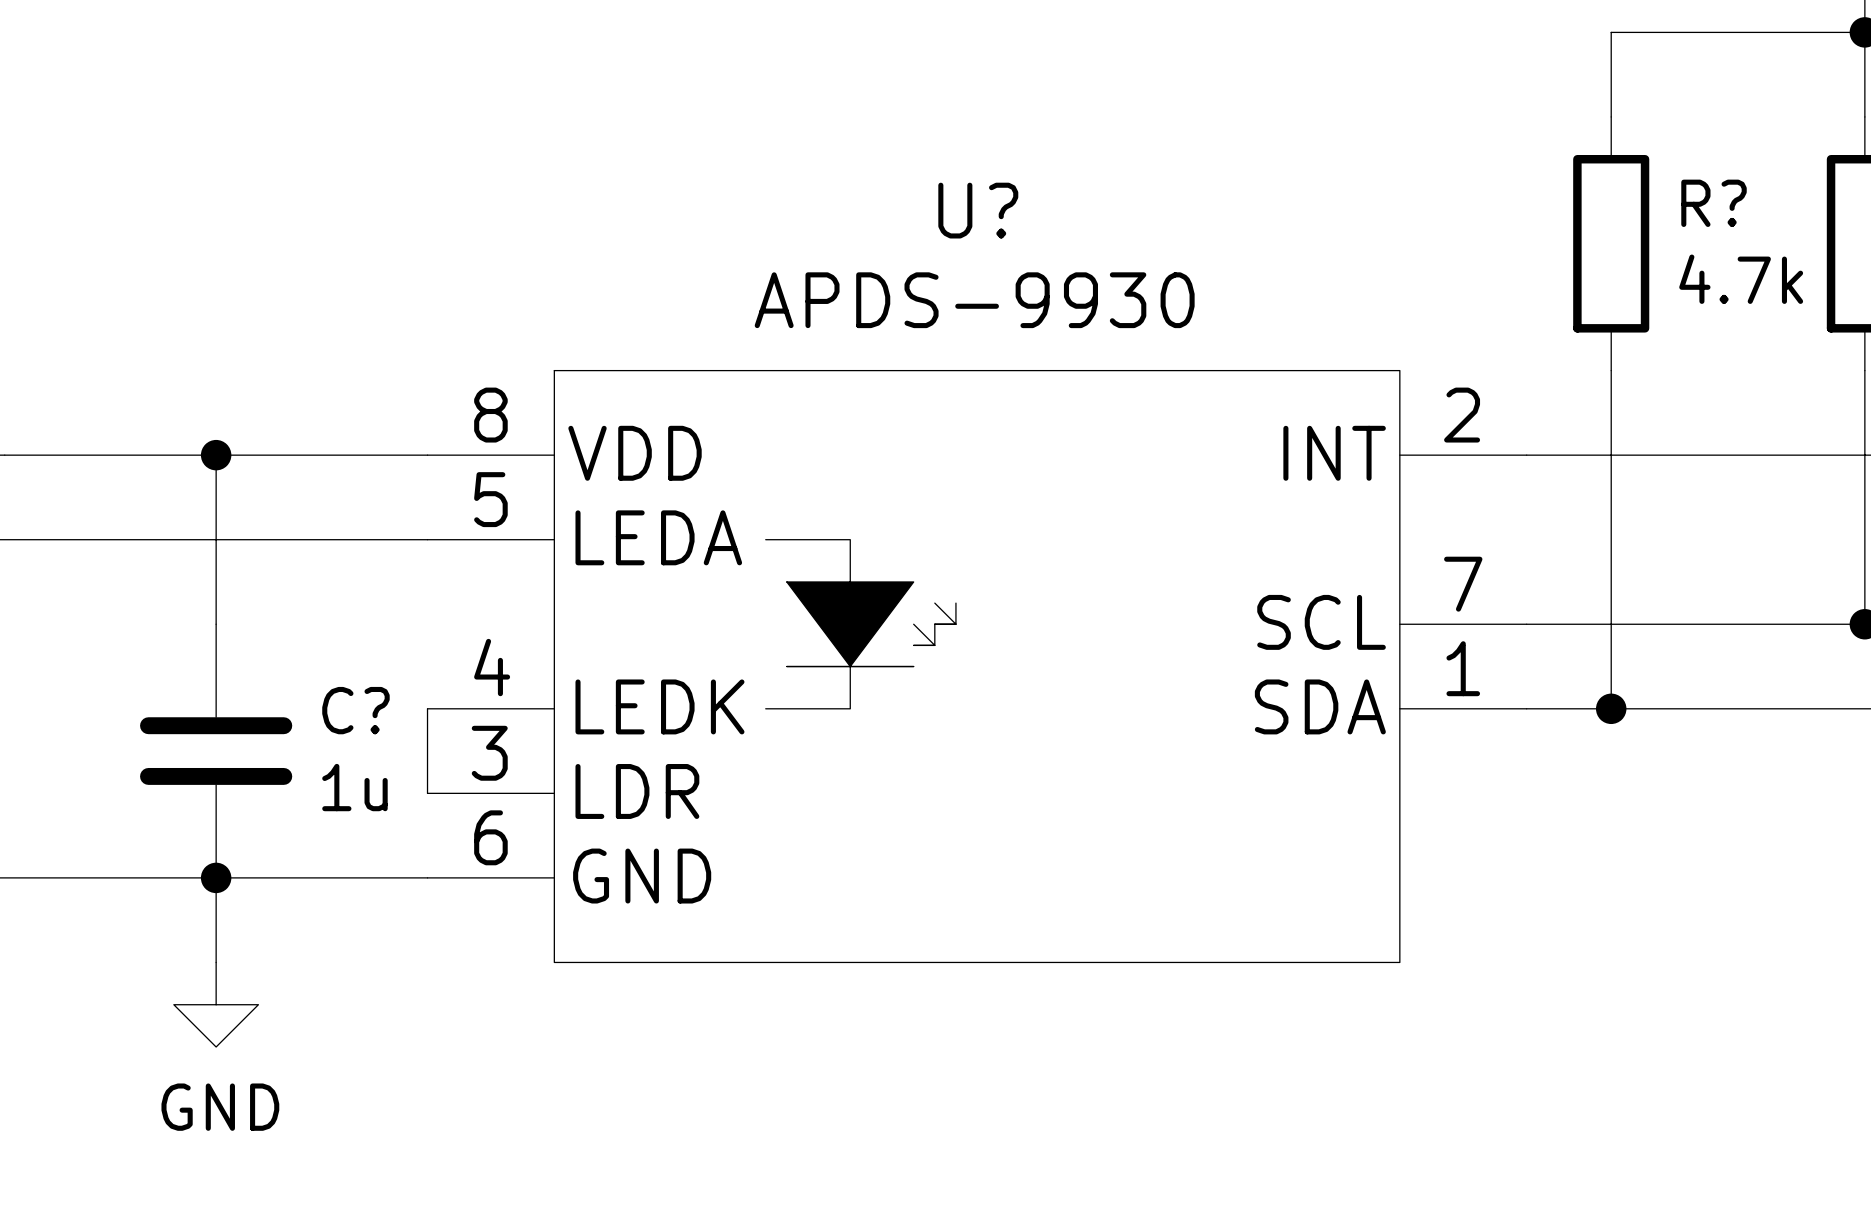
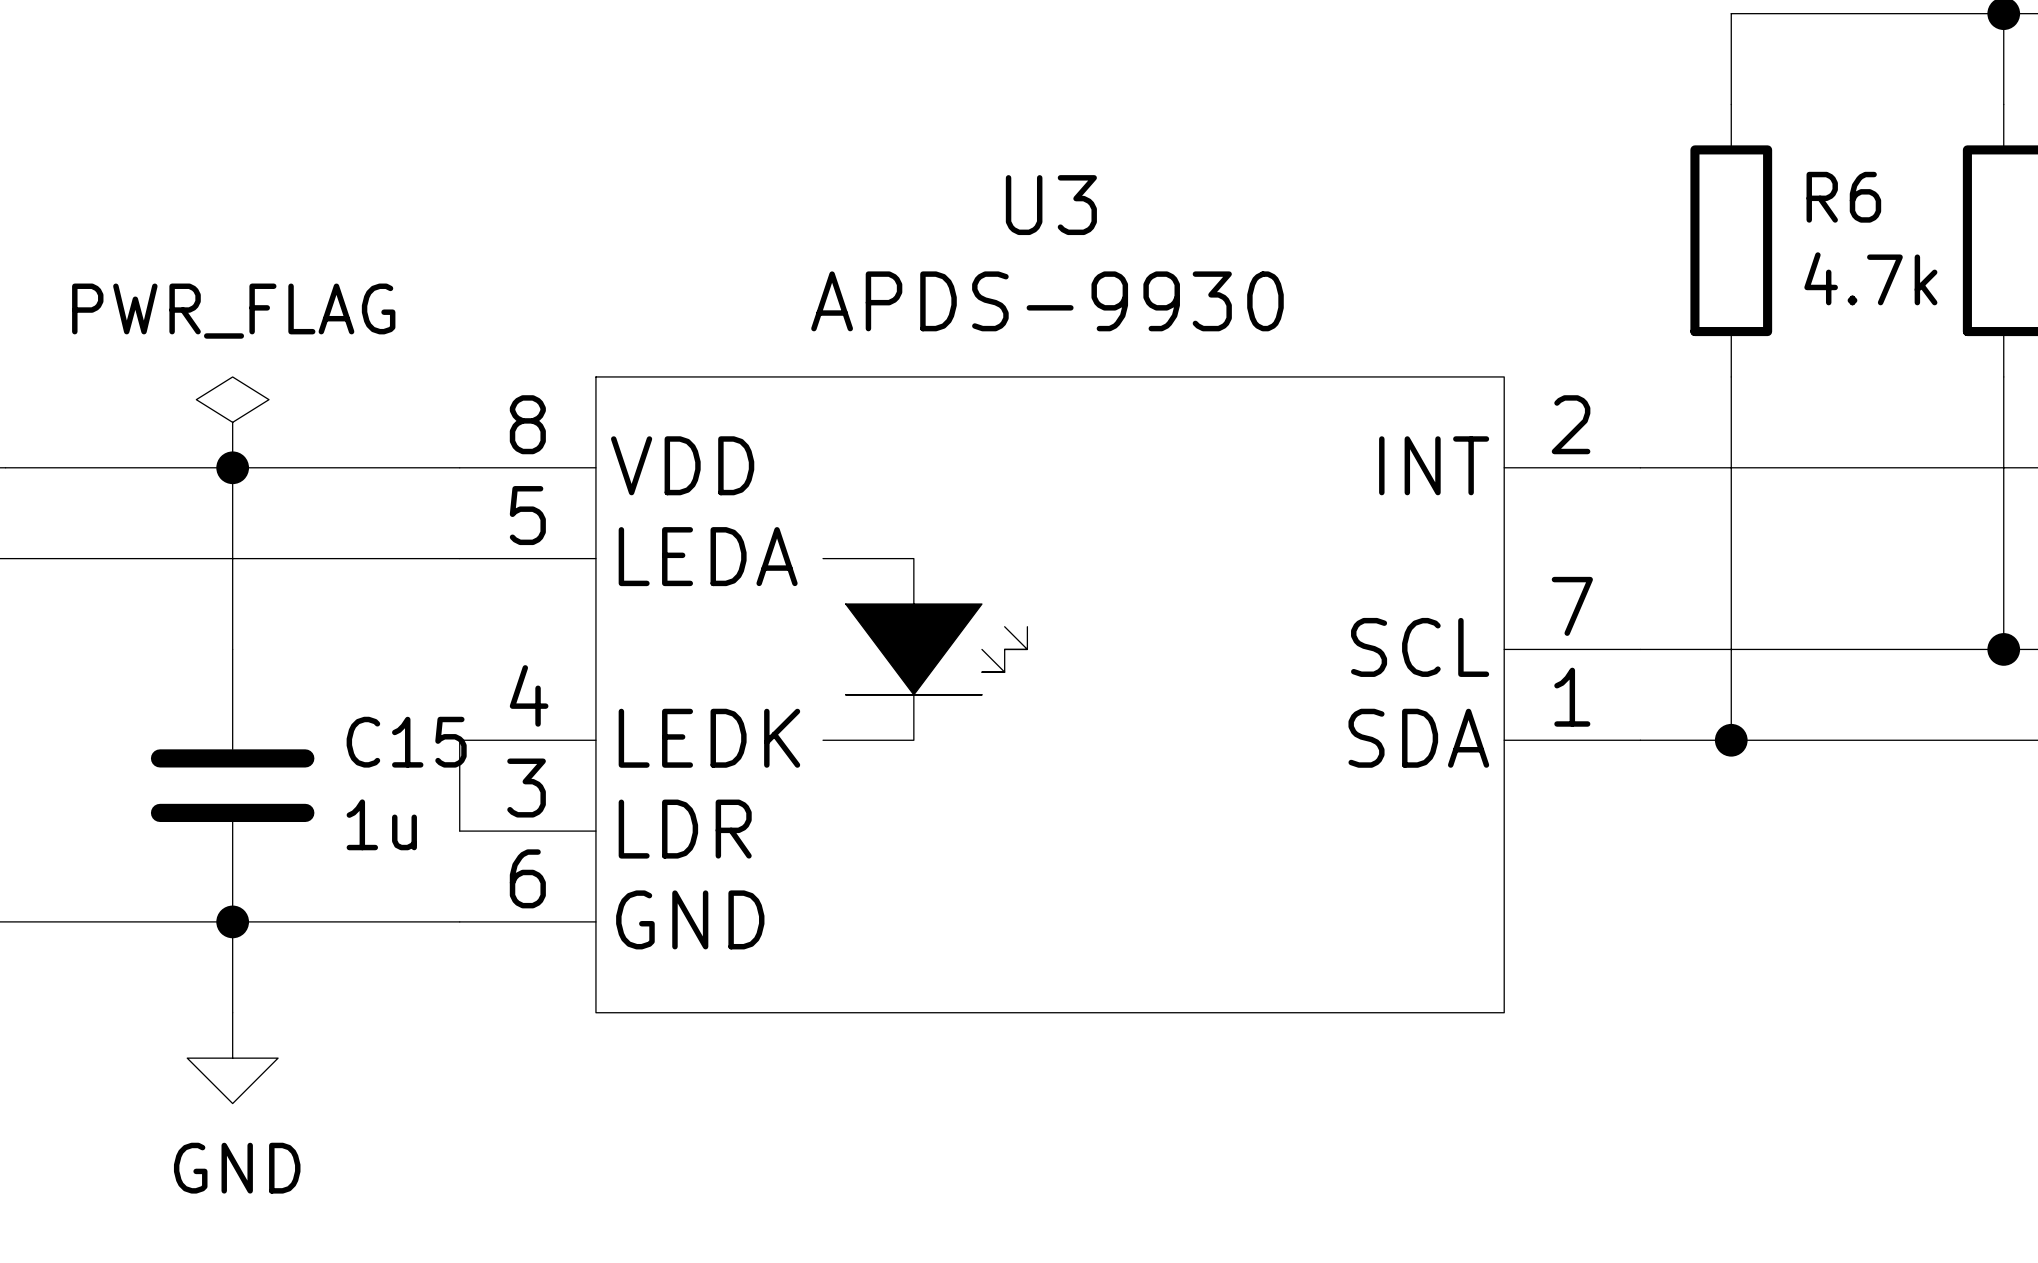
R? name: R? (1714, 203) -> R6 (1843, 197)
U? name: U? (978, 210) -> U3 (1051, 205)
power symbol: none -> PWR_FLAG (232, 422)
C? name: C? (355, 710) -> C15 (406, 742)

